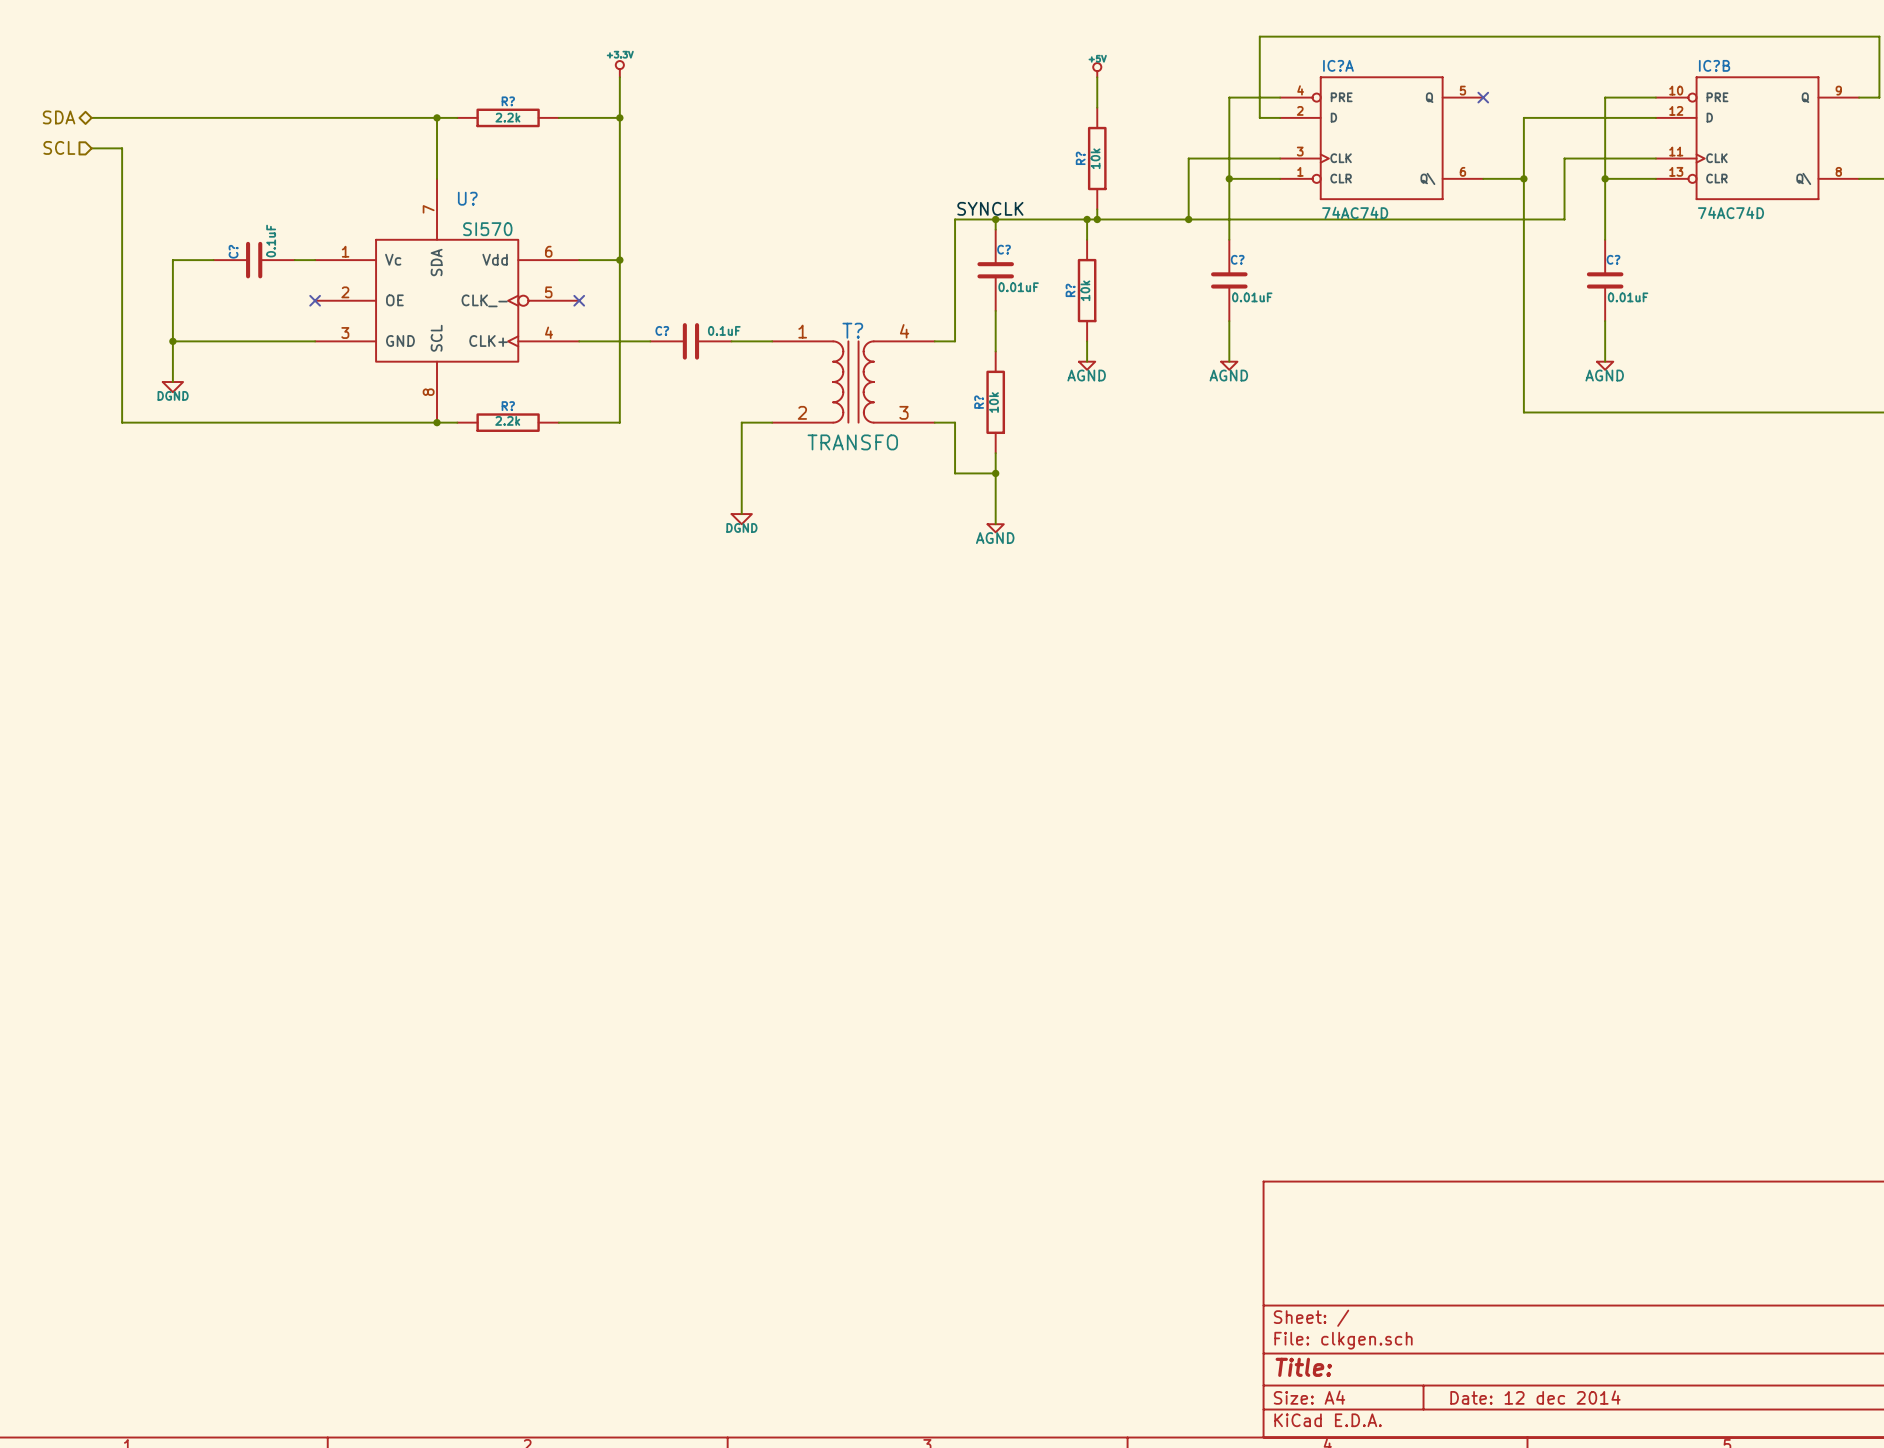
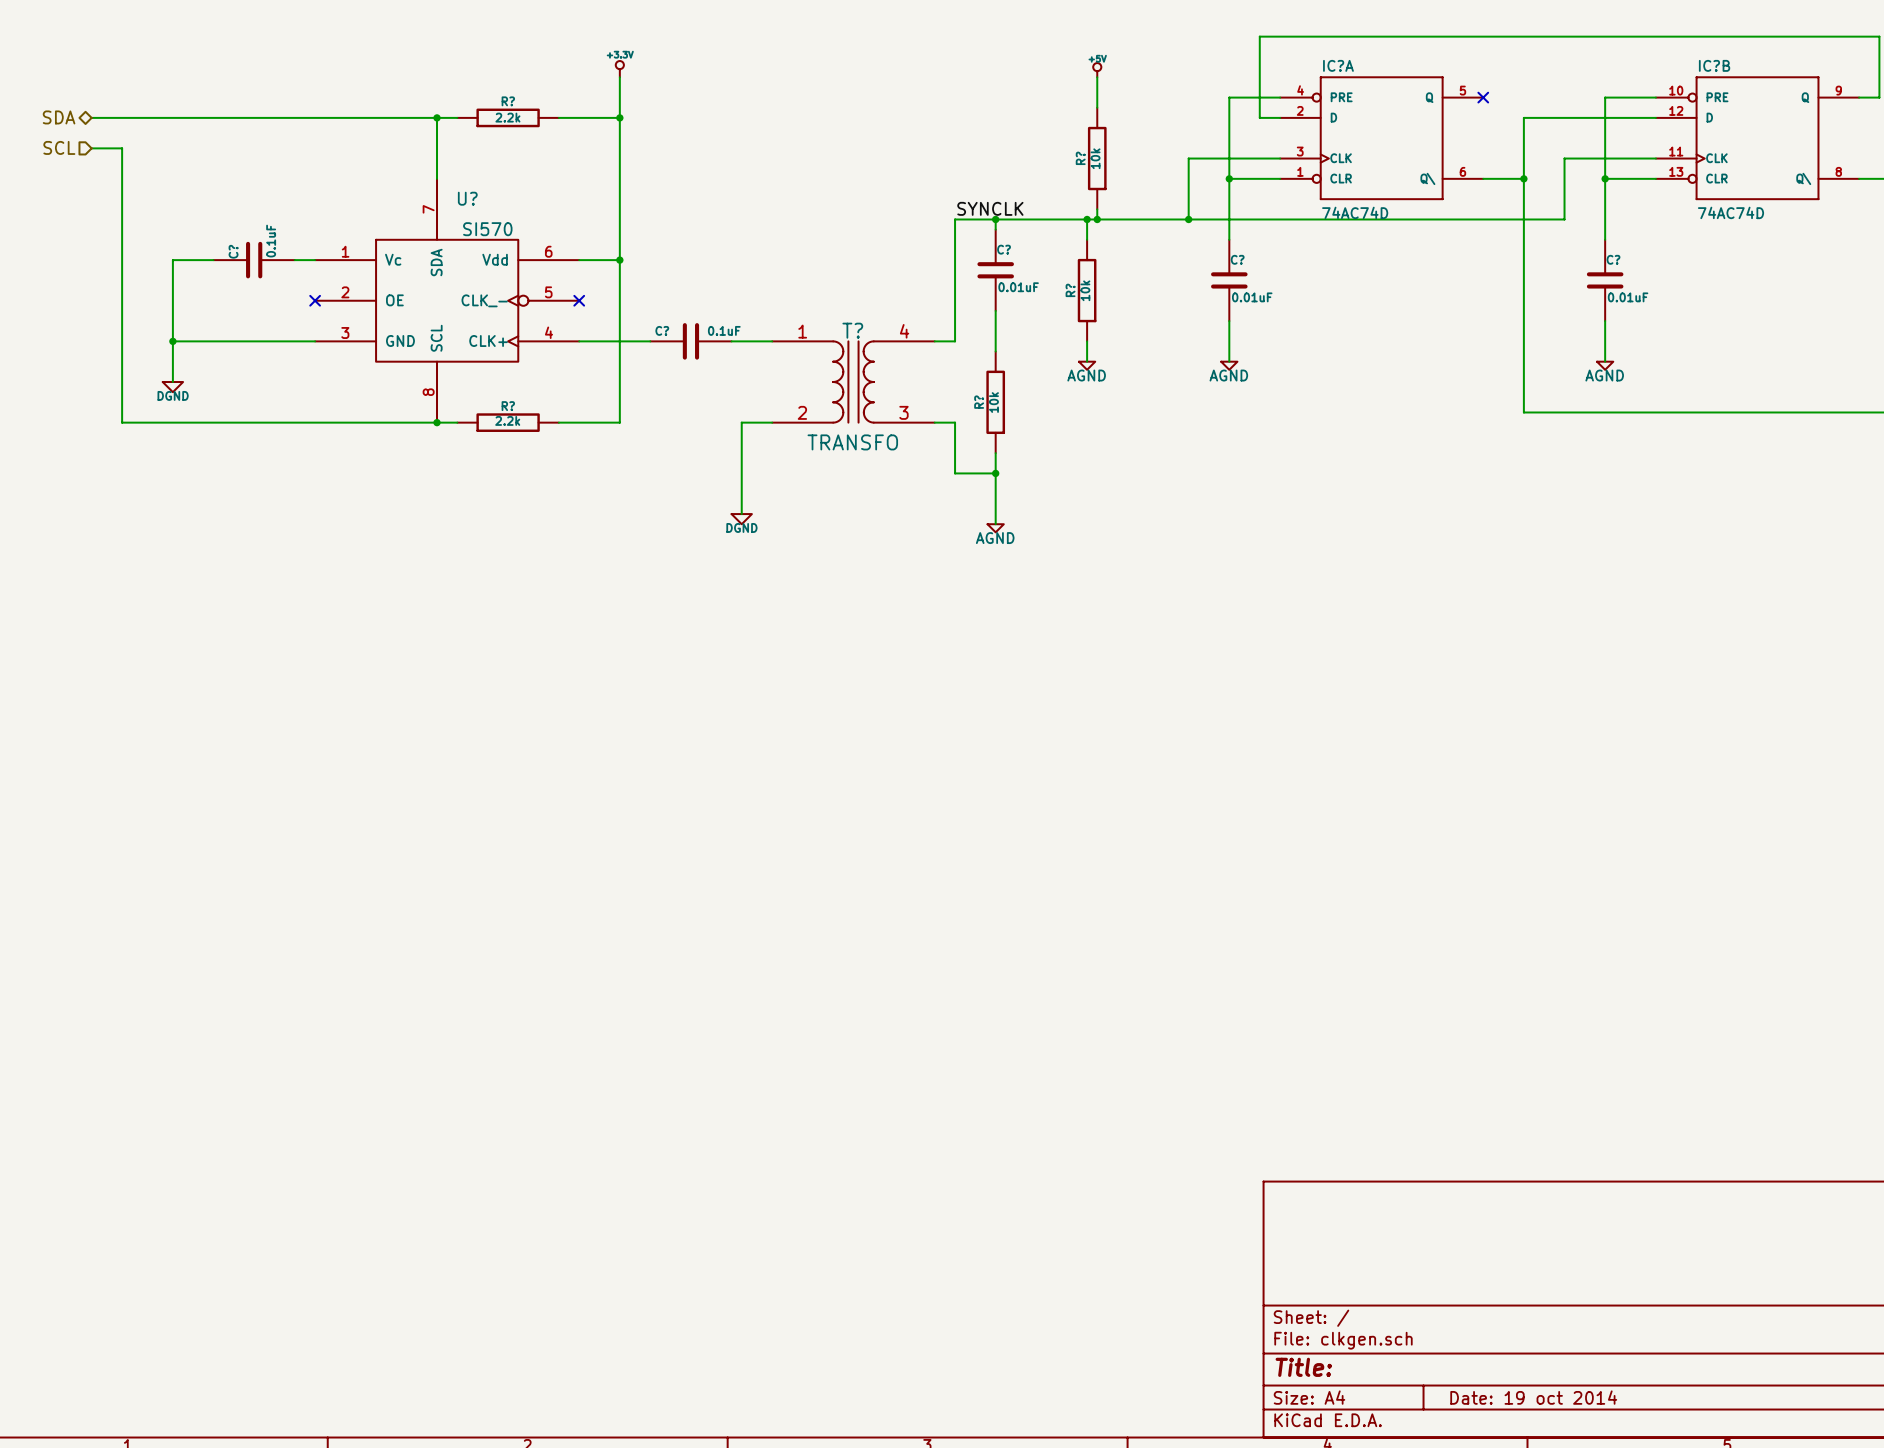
title block: Date: 12 dec 2014 (1535, 1397) -> Date: 19 oct 2014 (1533, 1397)

